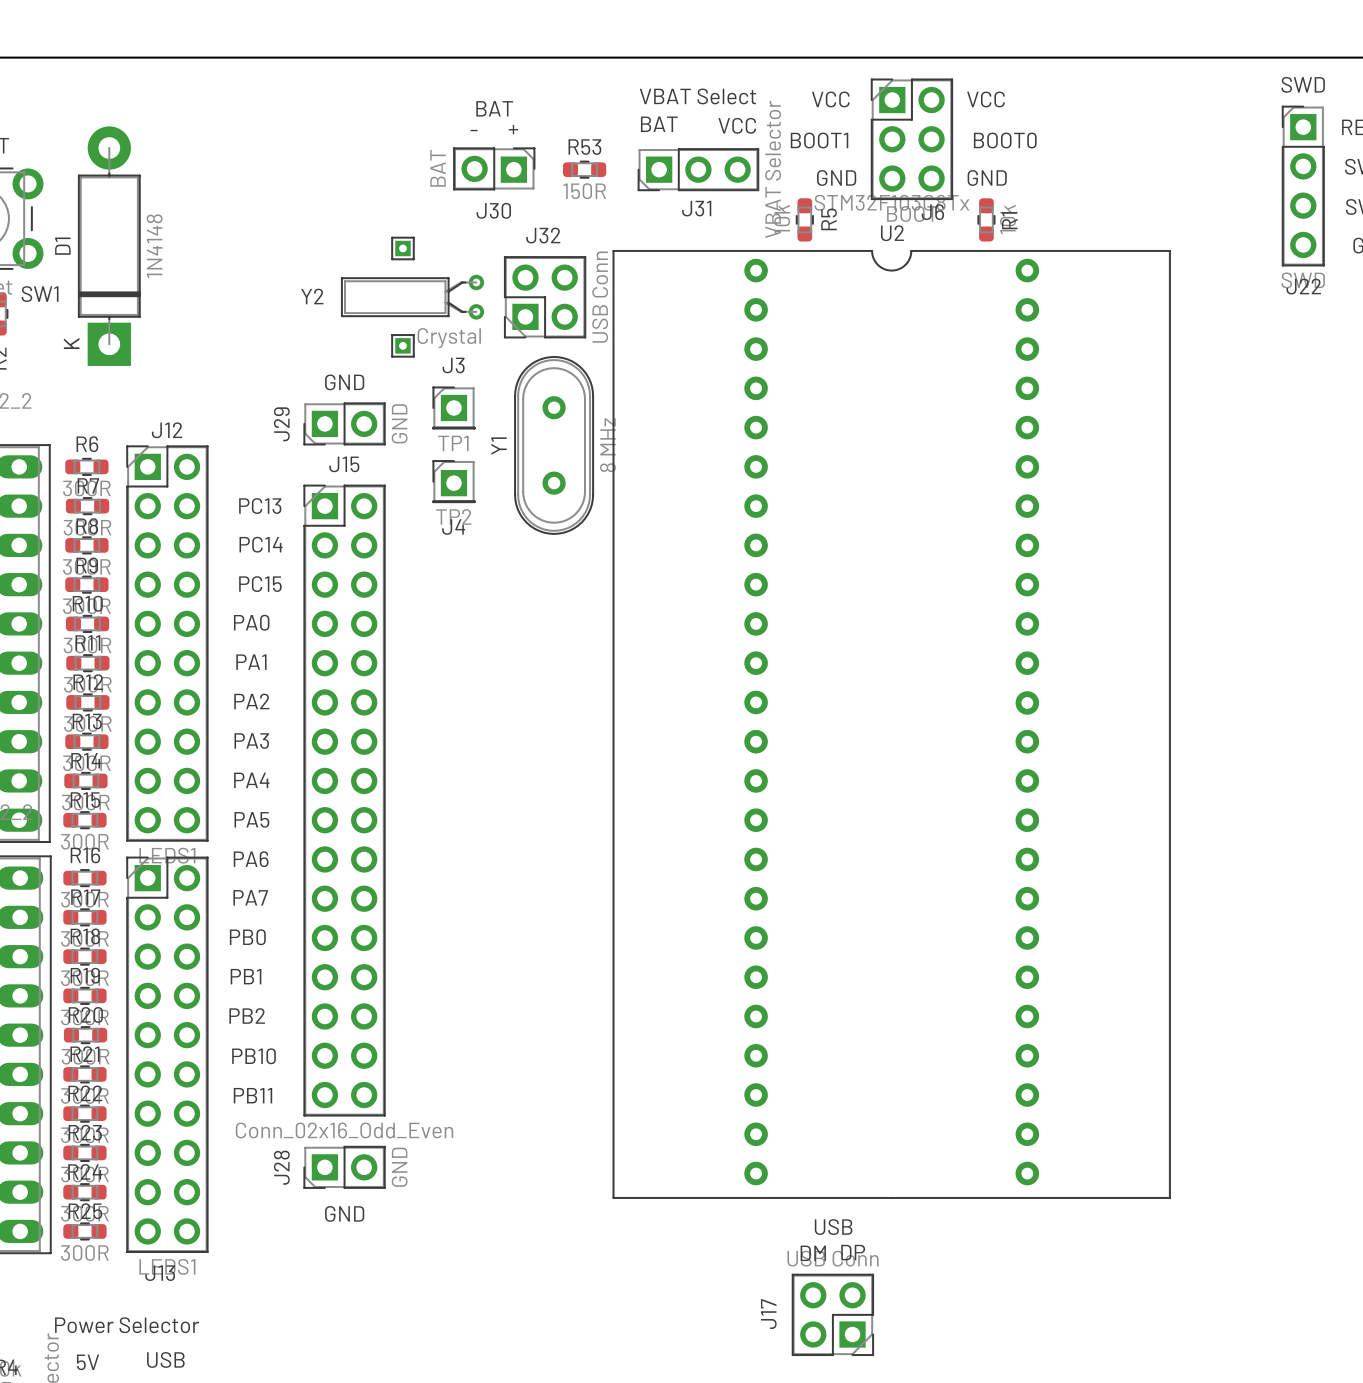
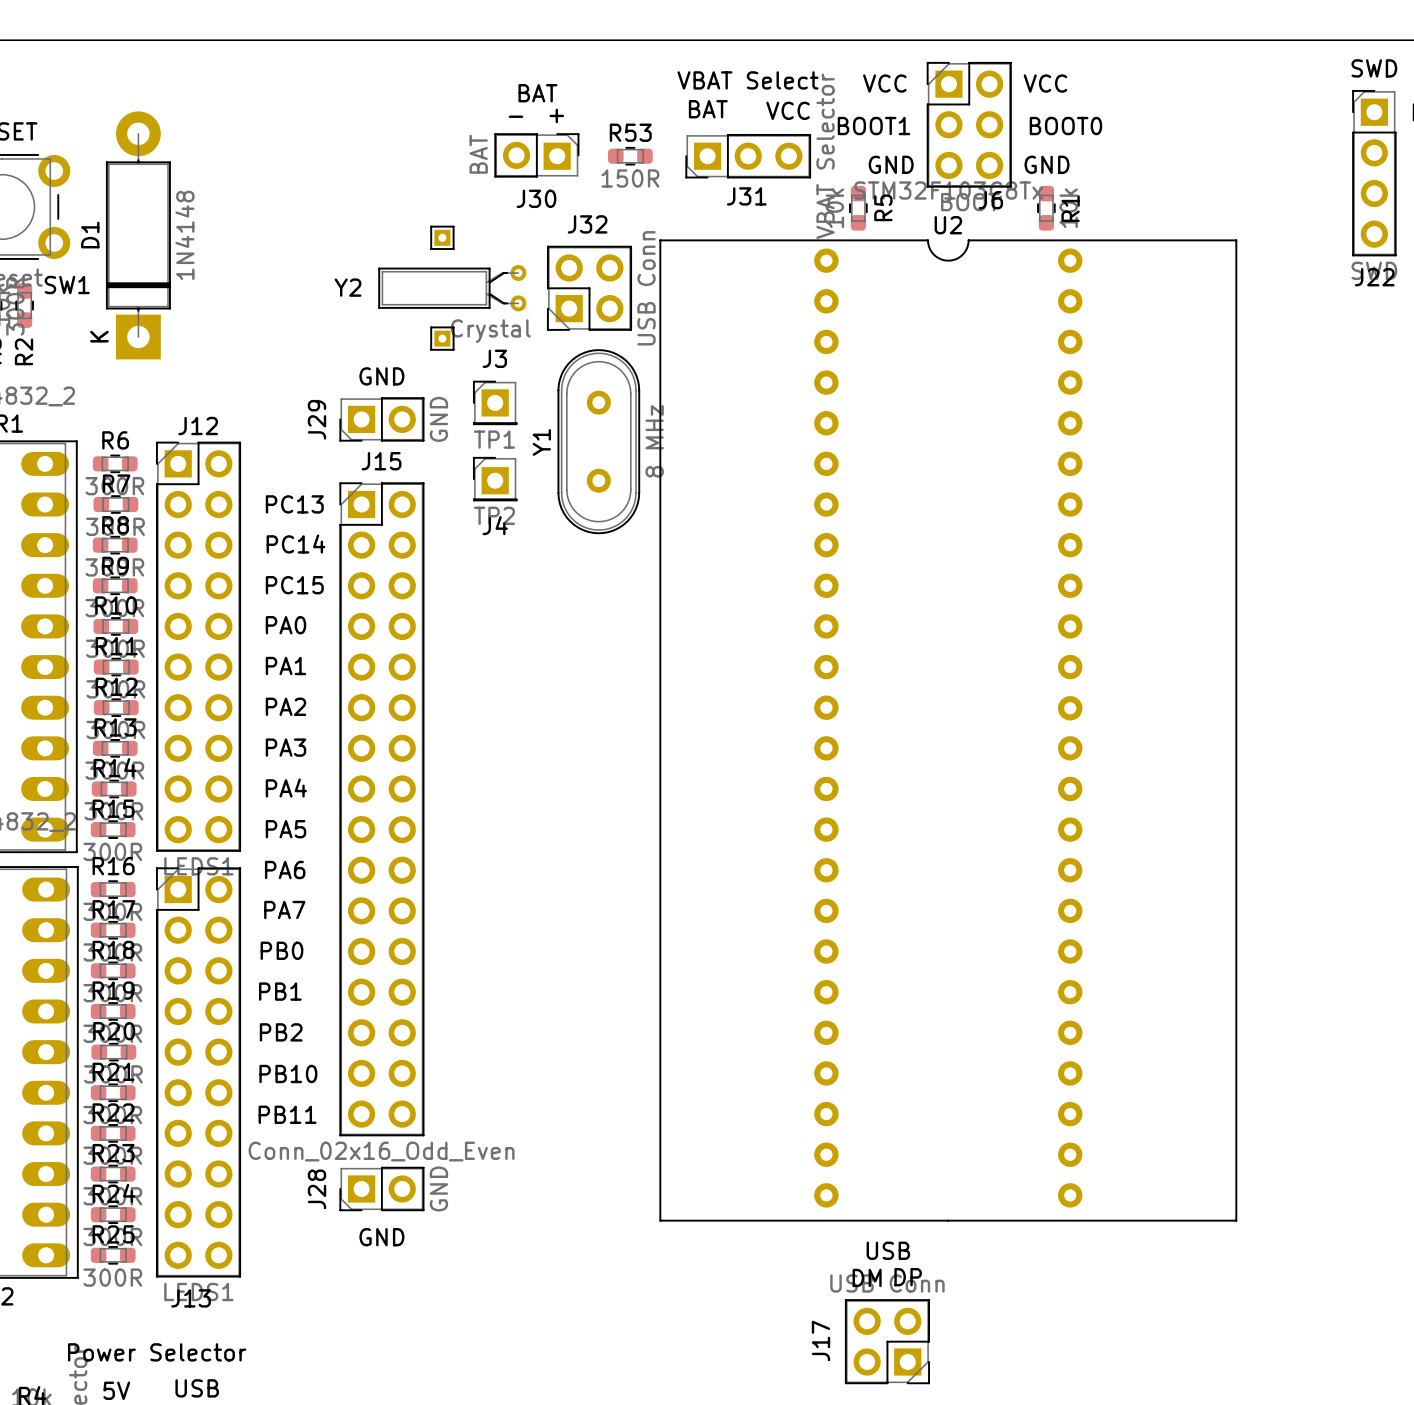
U2 footprint: [612, 250, 1171, 1199] -> [659, 239, 1238, 1222]

